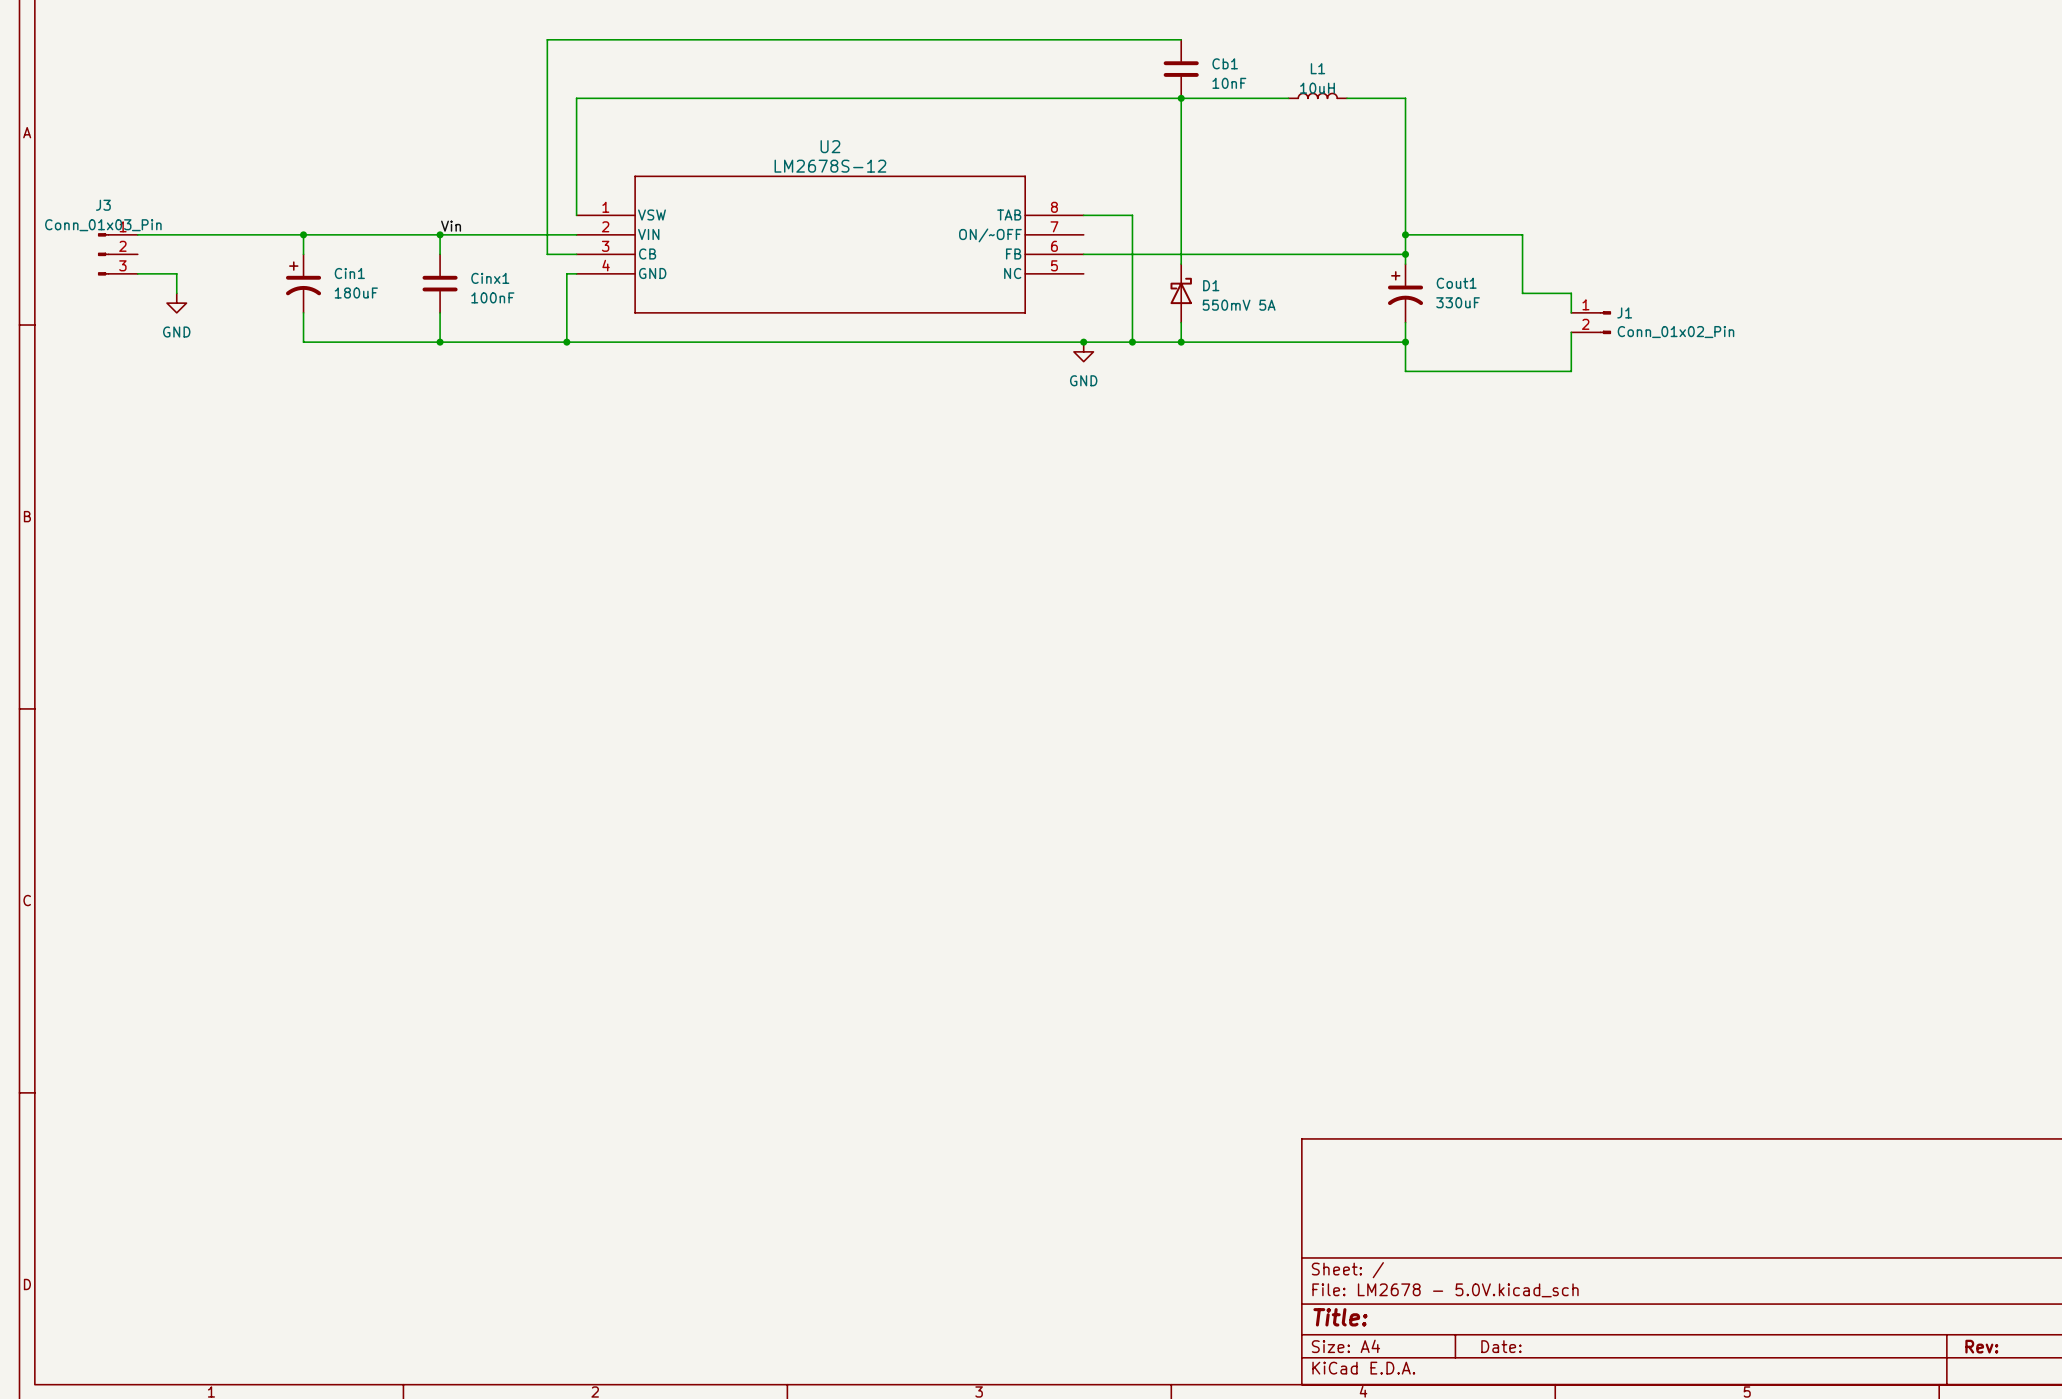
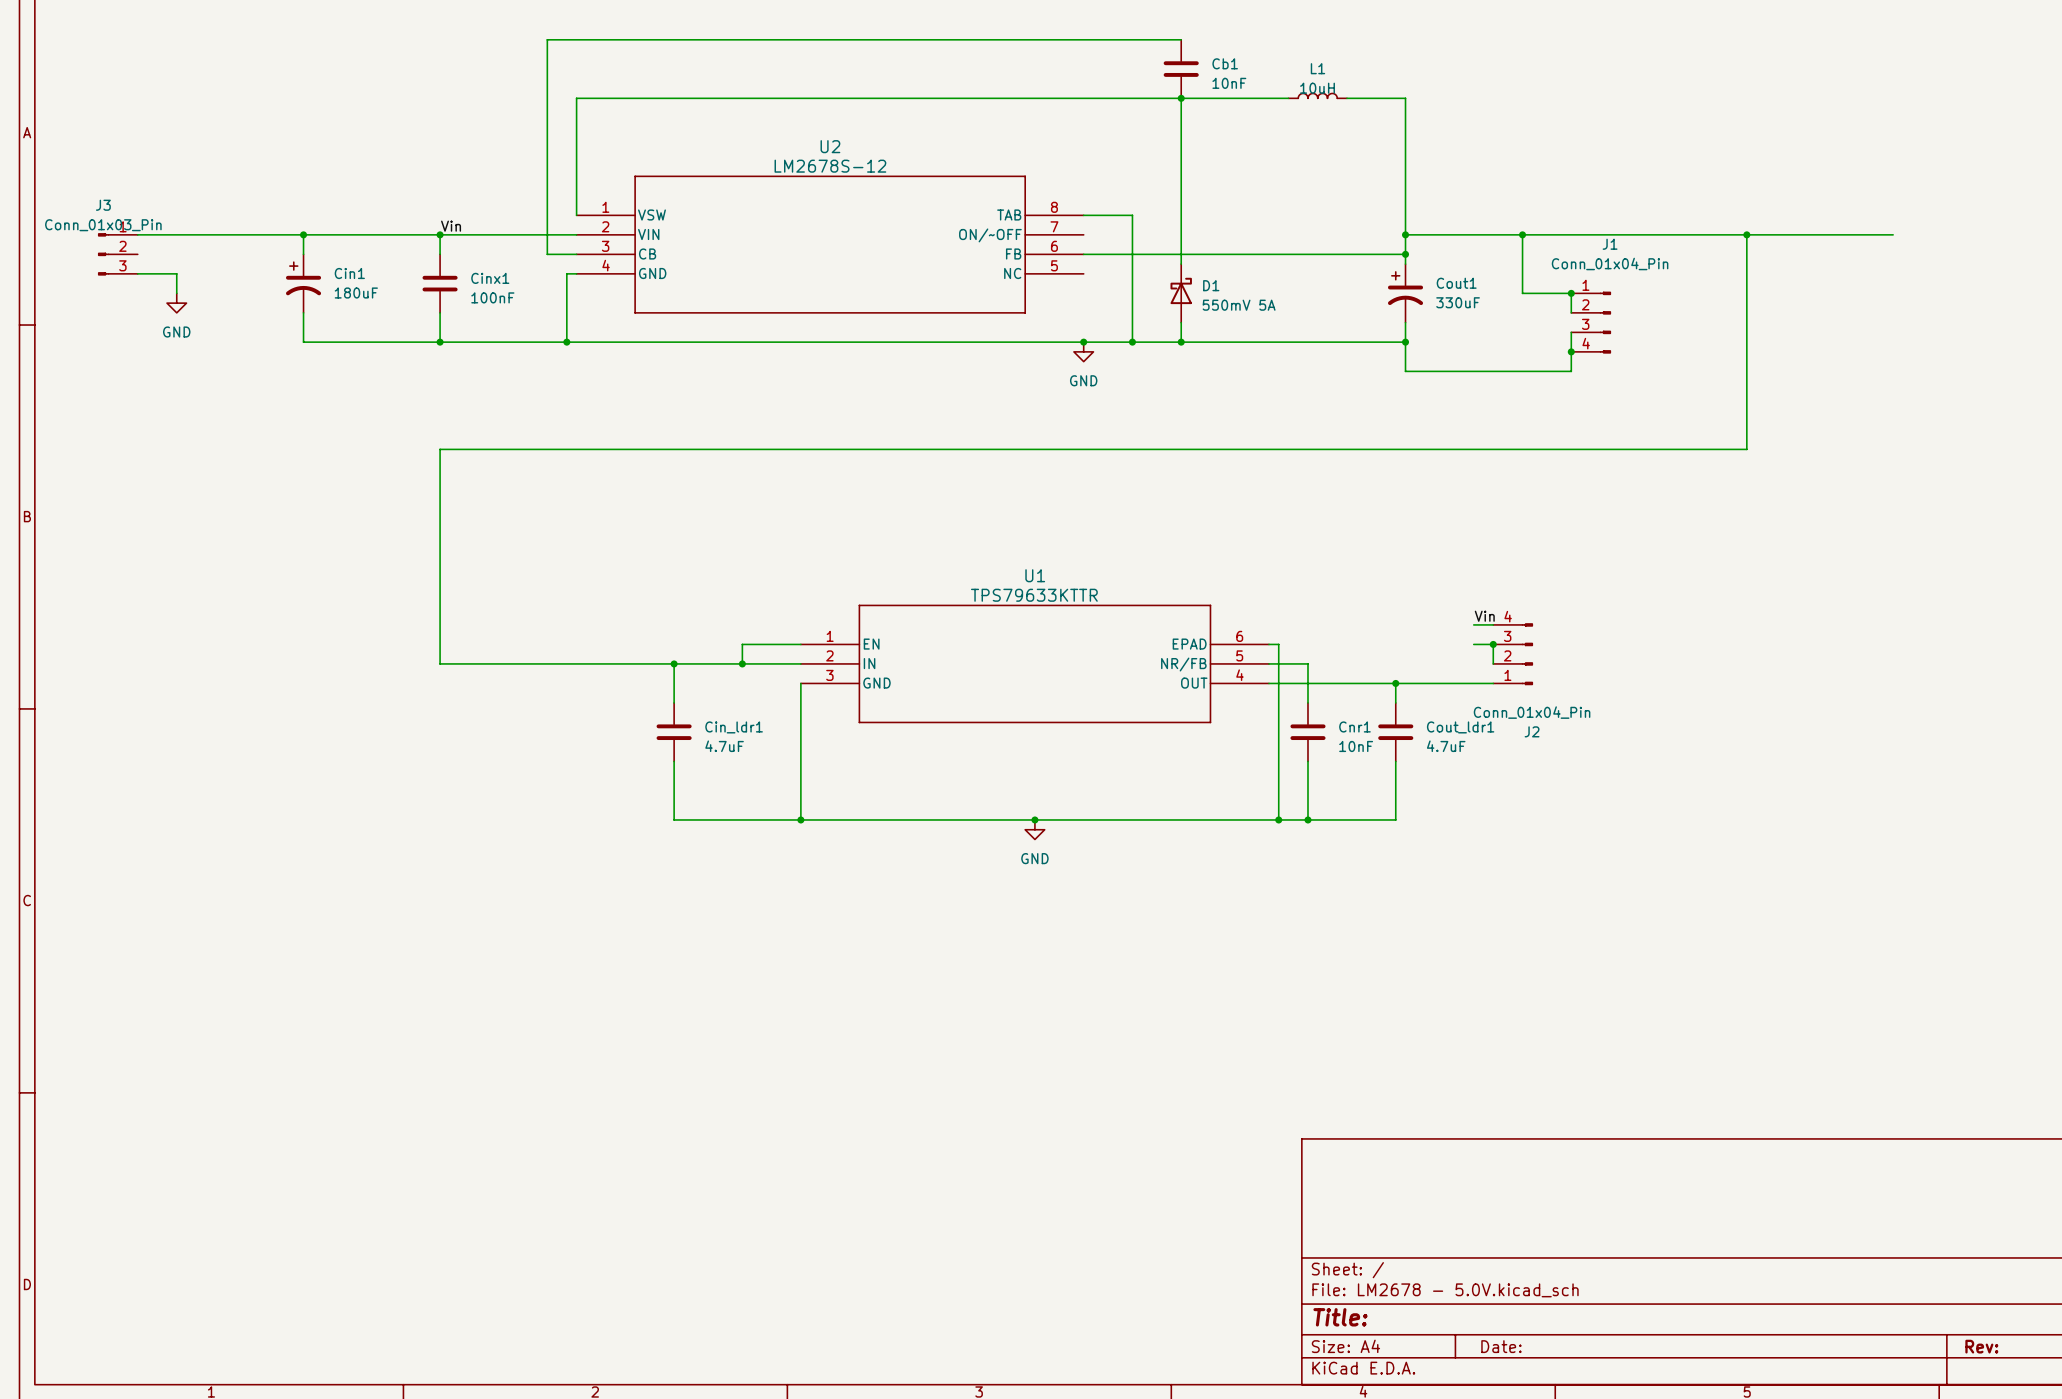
wire: none -> (1522, 234) (1893, 234)
junction: none -> (1522, 234)
wire: none -> (1746, 234) (1746, 449) (440, 449) (440, 663) (800, 663)
junction: none -> (1746, 234)
junction: none -> (1571, 293)
J1 symbol: [1571, 311, 1611, 334] -> [1571, 291, 1611, 354]
J1 name position: J1 (1624, 312) -> J1 (1610, 244)
J1 value: Conn_01x02_Pin (1675, 332) -> Conn_01x04_Pin (1610, 263)
junction: none -> (1571, 351)
label: none -> Vin (1484, 616)
wire: none -> (1473, 624) (1493, 624)
wire: none -> (800, 644) (742, 644) (742, 663)
wire: none -> (1268, 644) (1278, 644) (1278, 819)
wire: none -> (1473, 644) (1493, 644) (1493, 663)
junction: none -> (1493, 644)
J2: none -> Conn_01x04_Pin (1513, 654)
wire: none -> (674, 663) (674, 702)
junction: none -> (674, 663)
junction: none -> (742, 663)
U1: none -> TPS79633KTTR (1034, 663)
wire: none -> (1268, 663) (1307, 663) (1307, 702)
wire: none -> (800, 683) (800, 819)
wire: none -> (1268, 683) (1493, 683)
wire: none -> (1395, 683) (1395, 702)
junction: none -> (1395, 683)
Cin_ldr1: none -> 4.7uF (674, 732)
Cnr1: none -> 10nF (1307, 732)
Cout_ldr1: none -> 4.7uF (1395, 732)
wire: none -> (674, 761) (674, 819) (1395, 819) (1395, 761)
wire: none -> (1307, 761) (1307, 819)
junction: none -> (800, 819)
junction: none -> (1034, 819)
junction: none -> (1278, 819)
junction: none -> (1307, 819)
power symbol: none -> GND (1034, 829)

